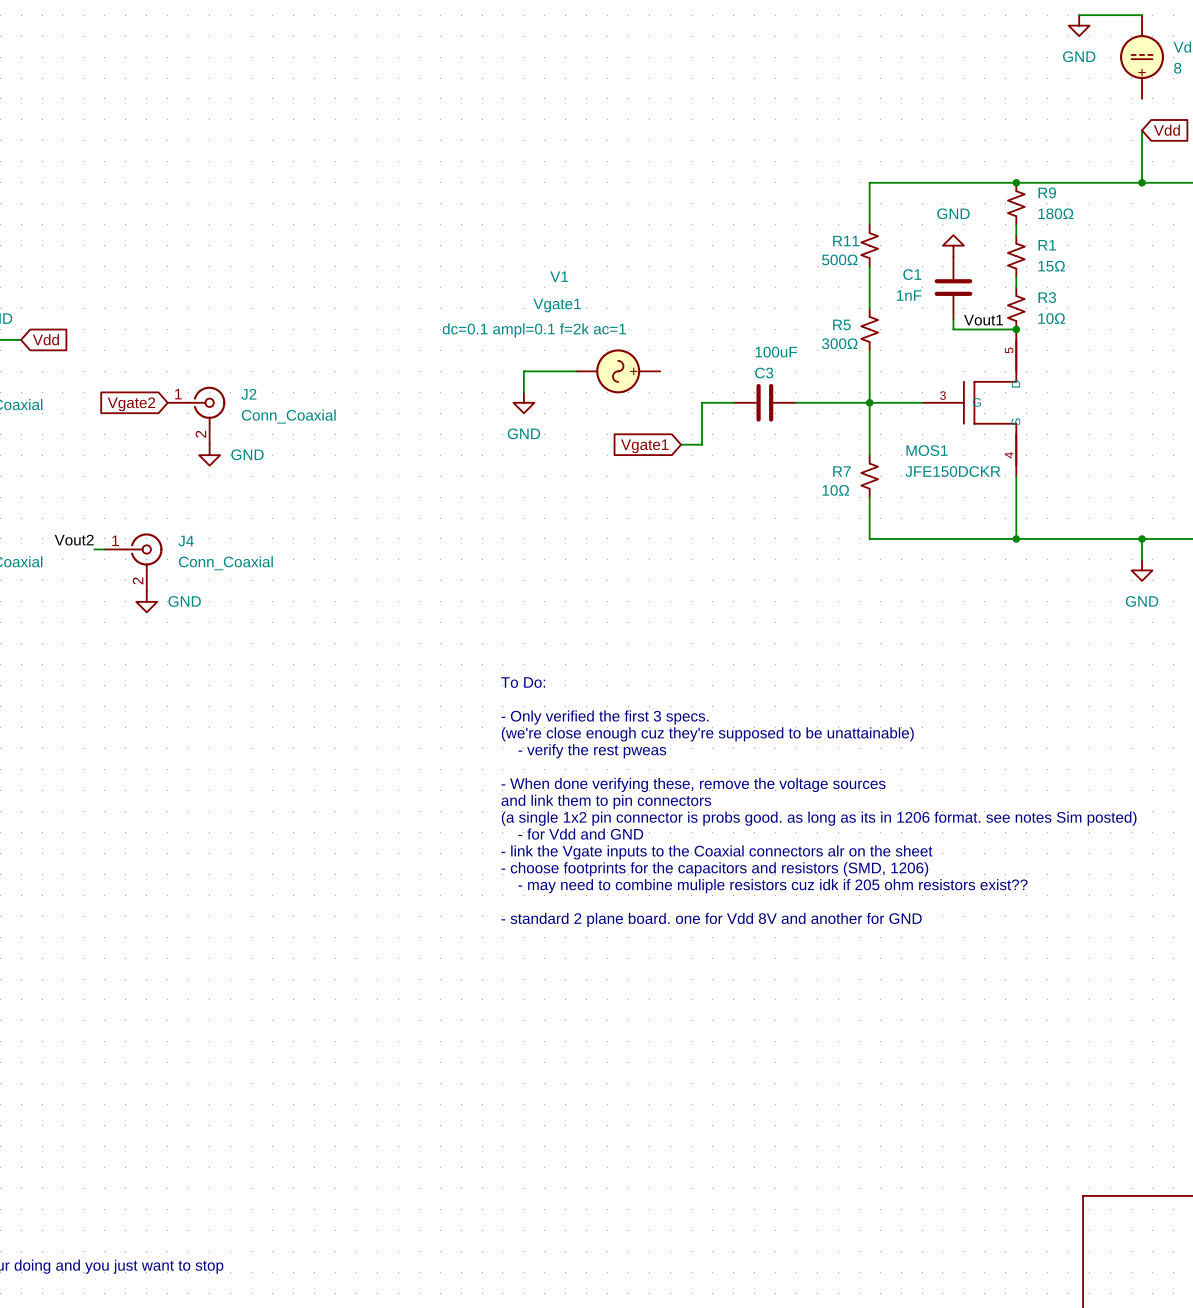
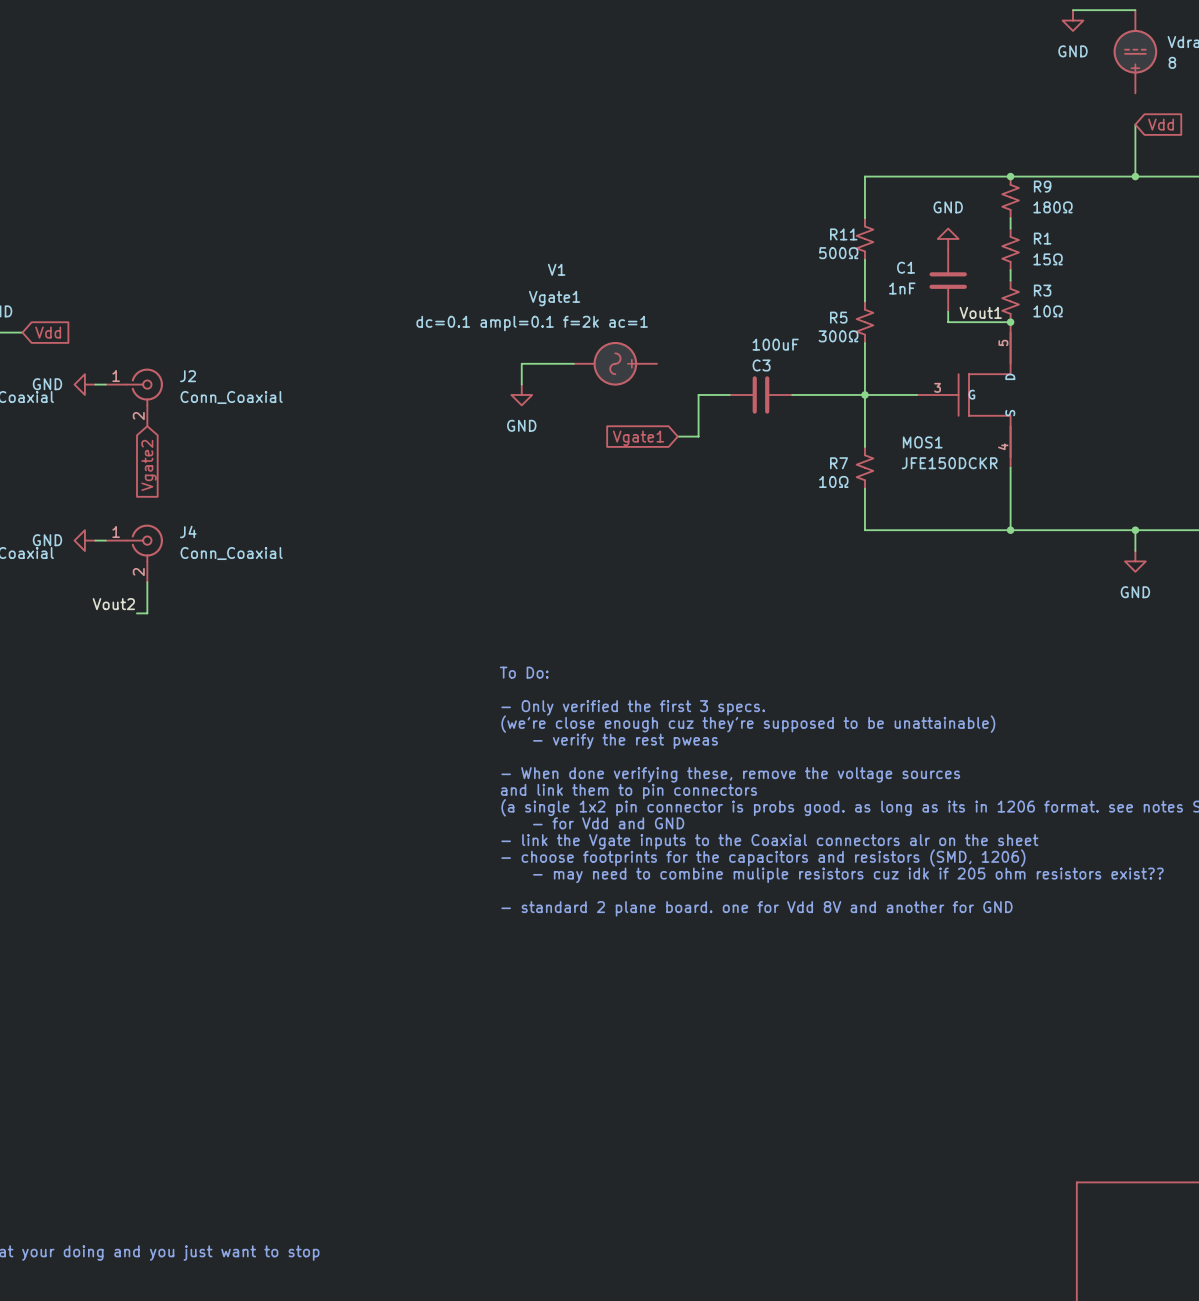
power symbol: none -> GND (84, 384)
global label rotation: 0° (131, 404) -> 90° counterclockwise (149, 465)
J2 position: (196, 415) -> (134, 397)
power symbol: GND (209, 455) -> none
label position: Vout2 (74, 540) -> Vout2 (113, 604)
power symbol: none -> GND (84, 540)
wire: none -> (147, 582) (147, 613) (136, 613)
power symbol: GND (146, 601) -> none

